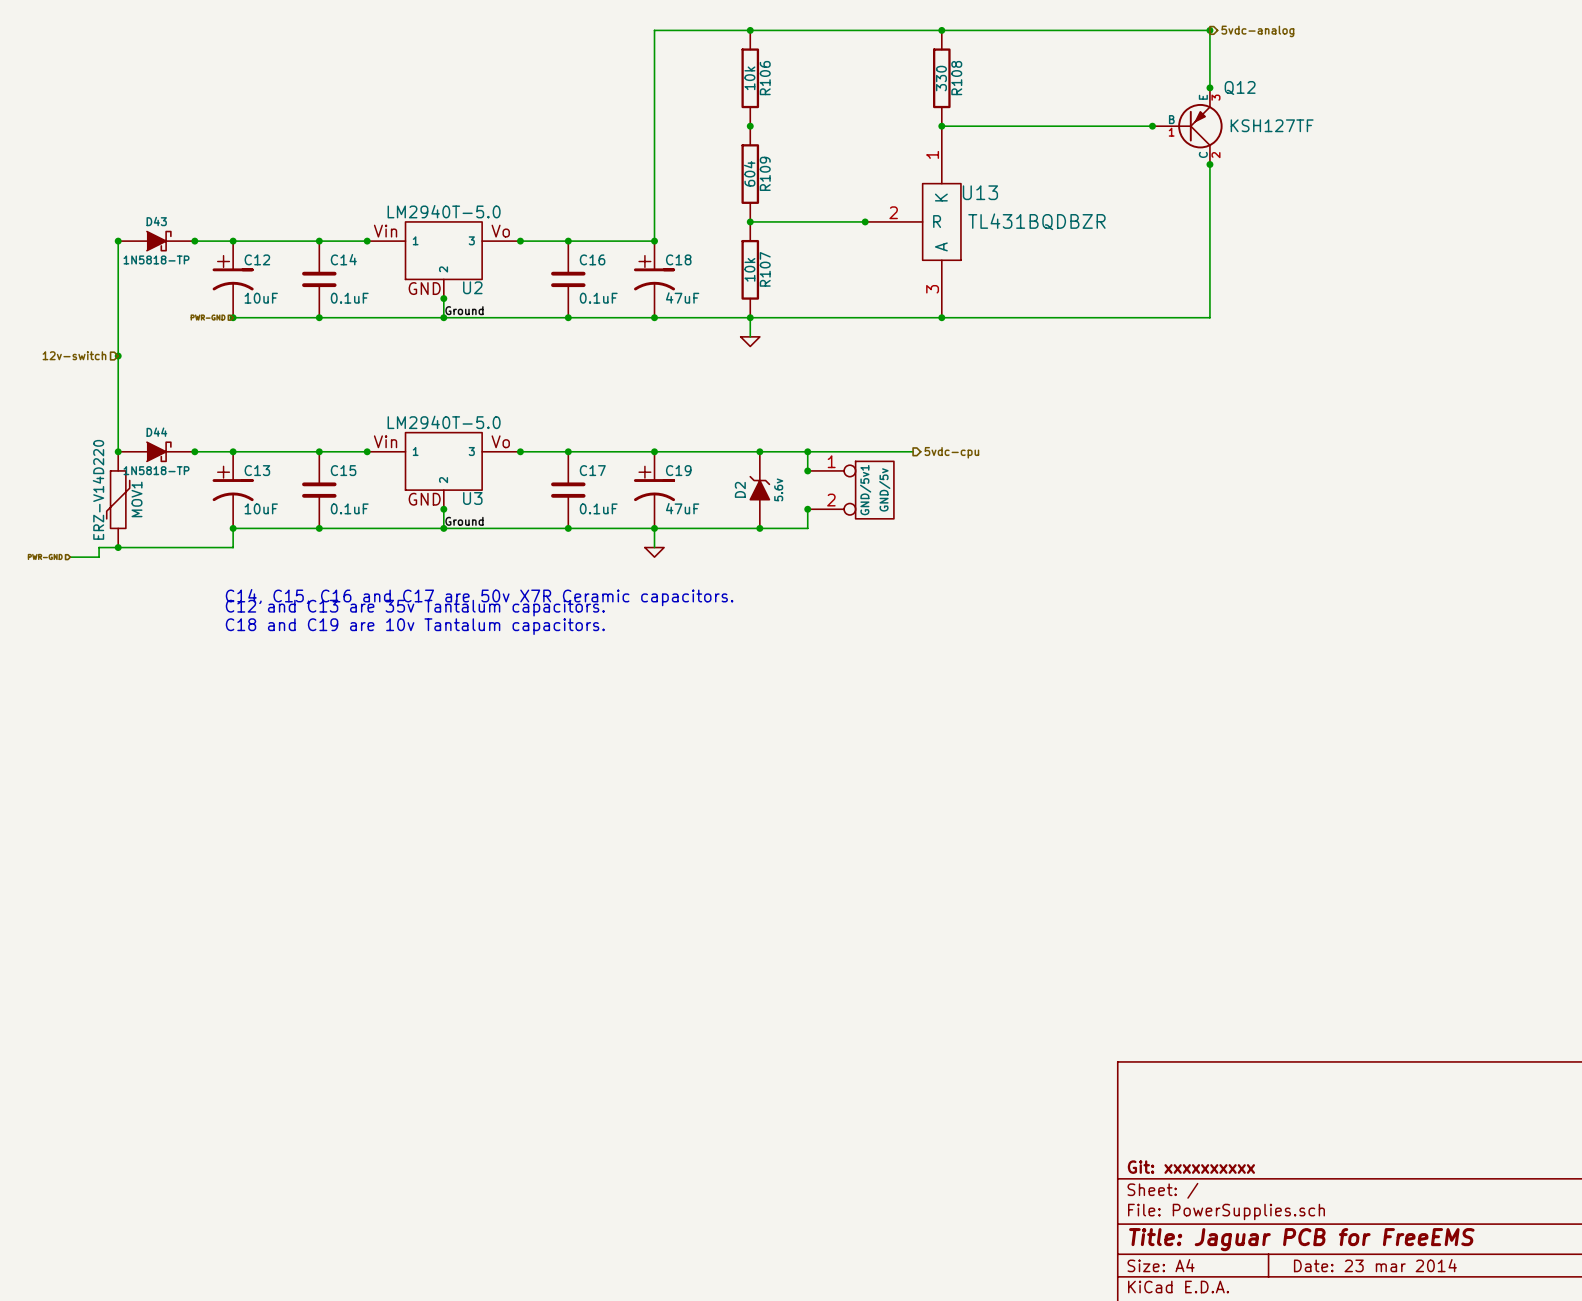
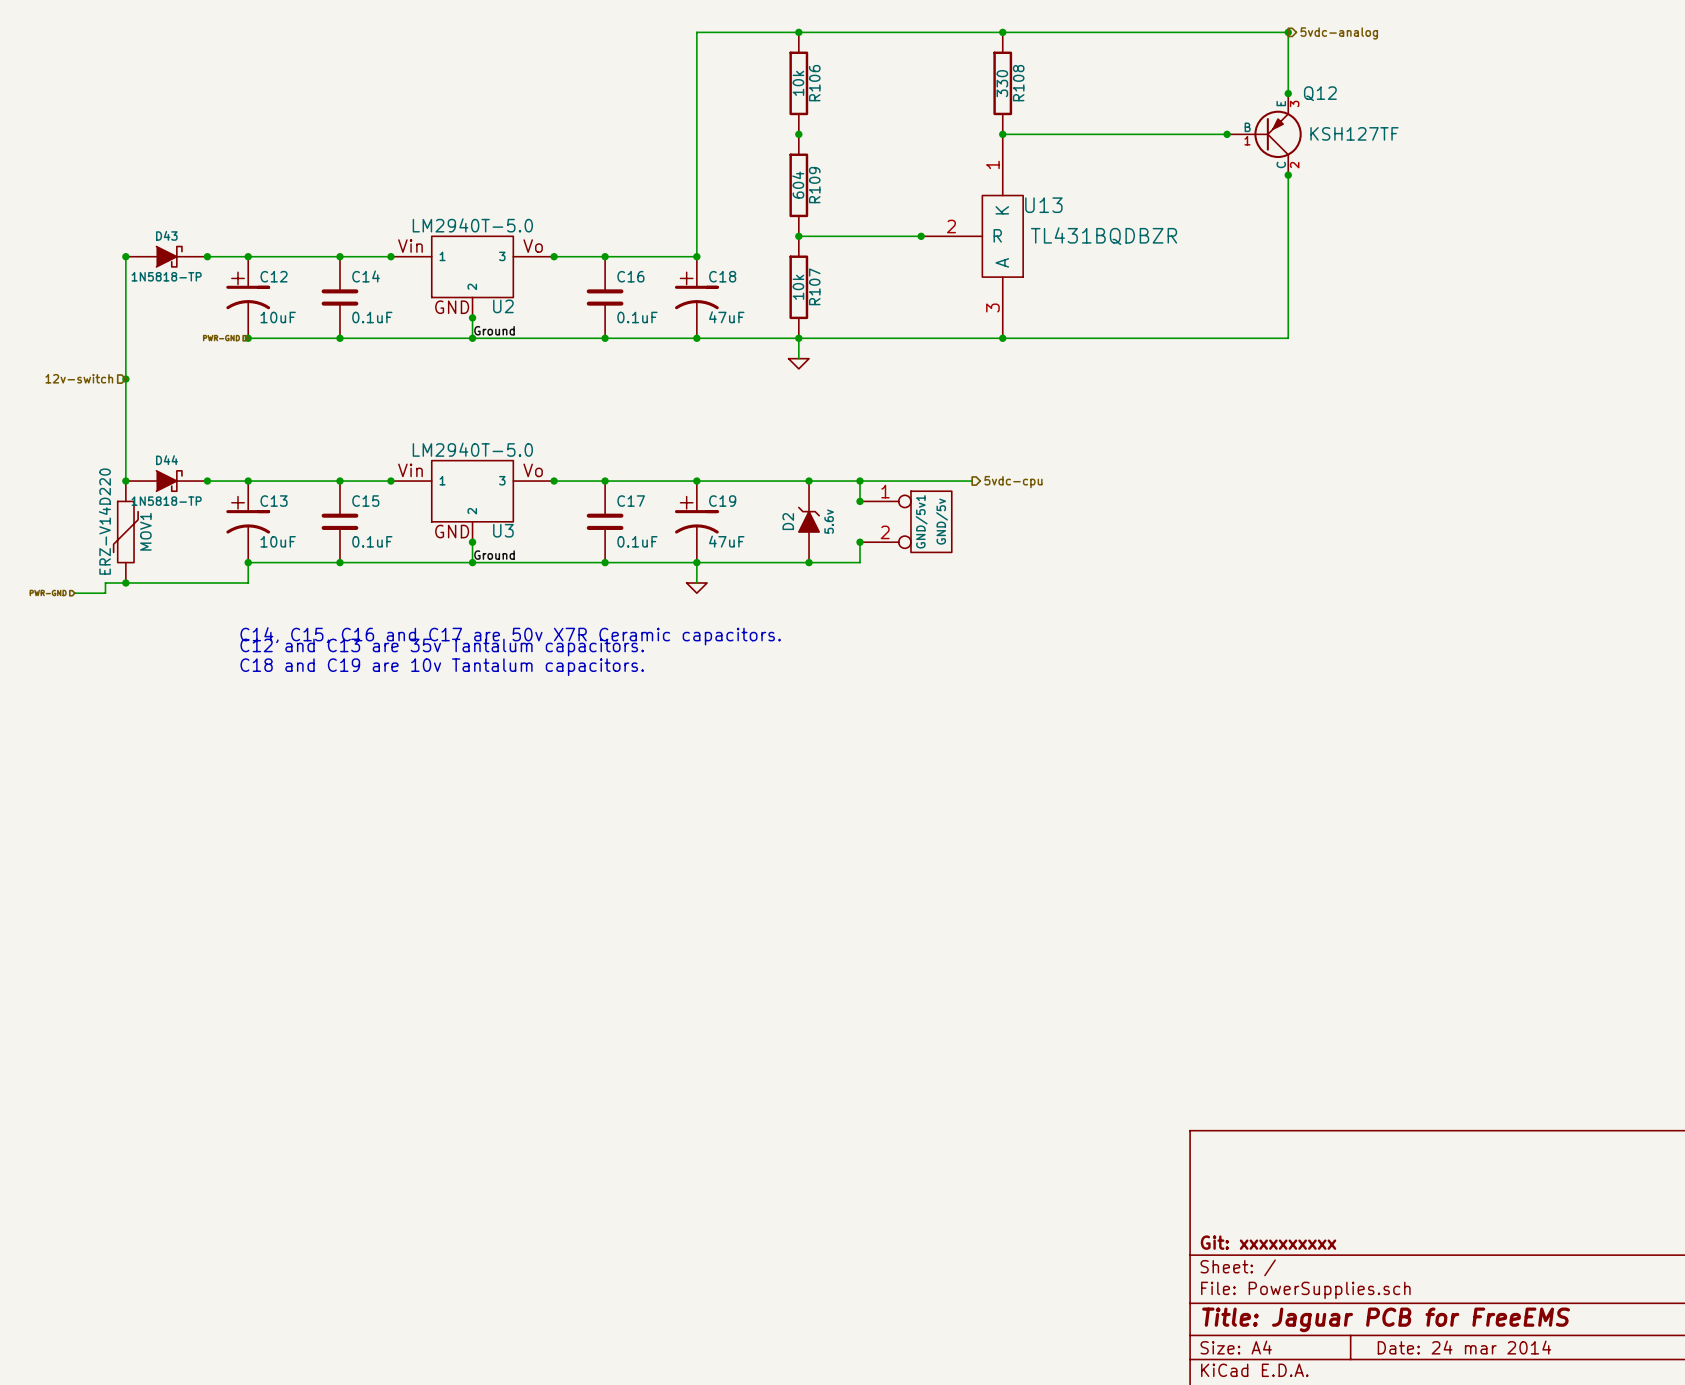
title block: Date: 23 mar 2014 (1375, 1265) -> Date: 24 mar 2014 (1464, 1347)

